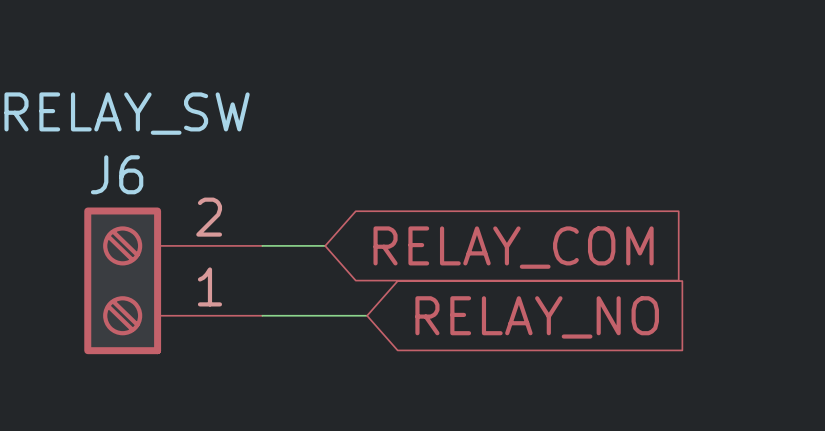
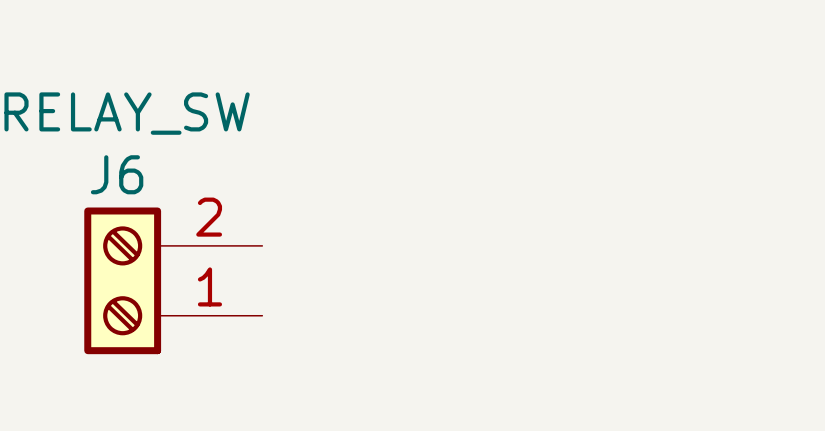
wire: (262, 245) (325, 245) -> none
global label: RELAY_COM (513, 247) -> none
wire: (262, 315) (367, 315) -> none
global label: RELAY_NO (537, 317) -> none

